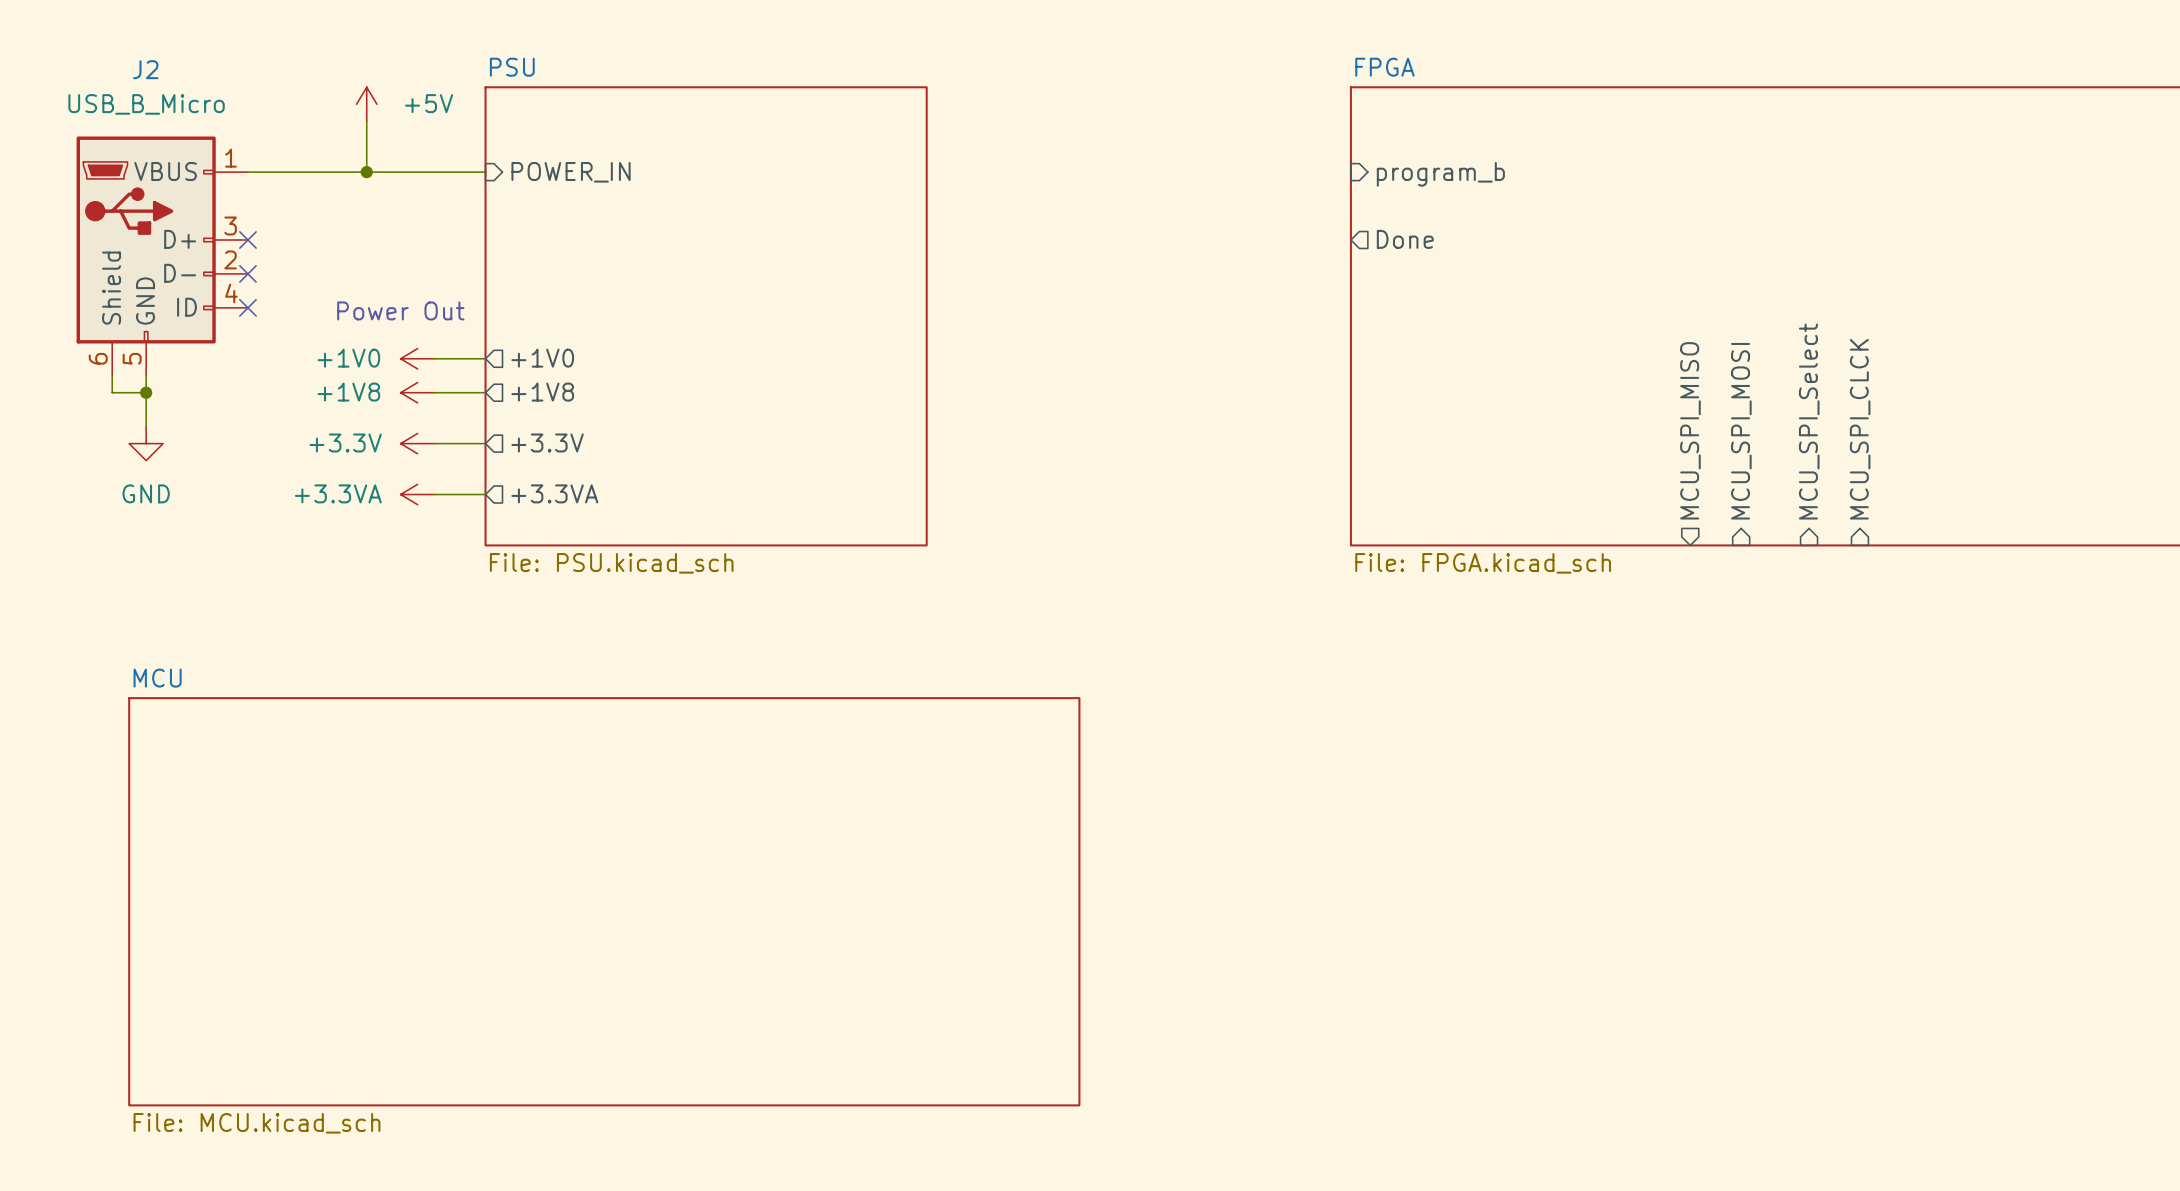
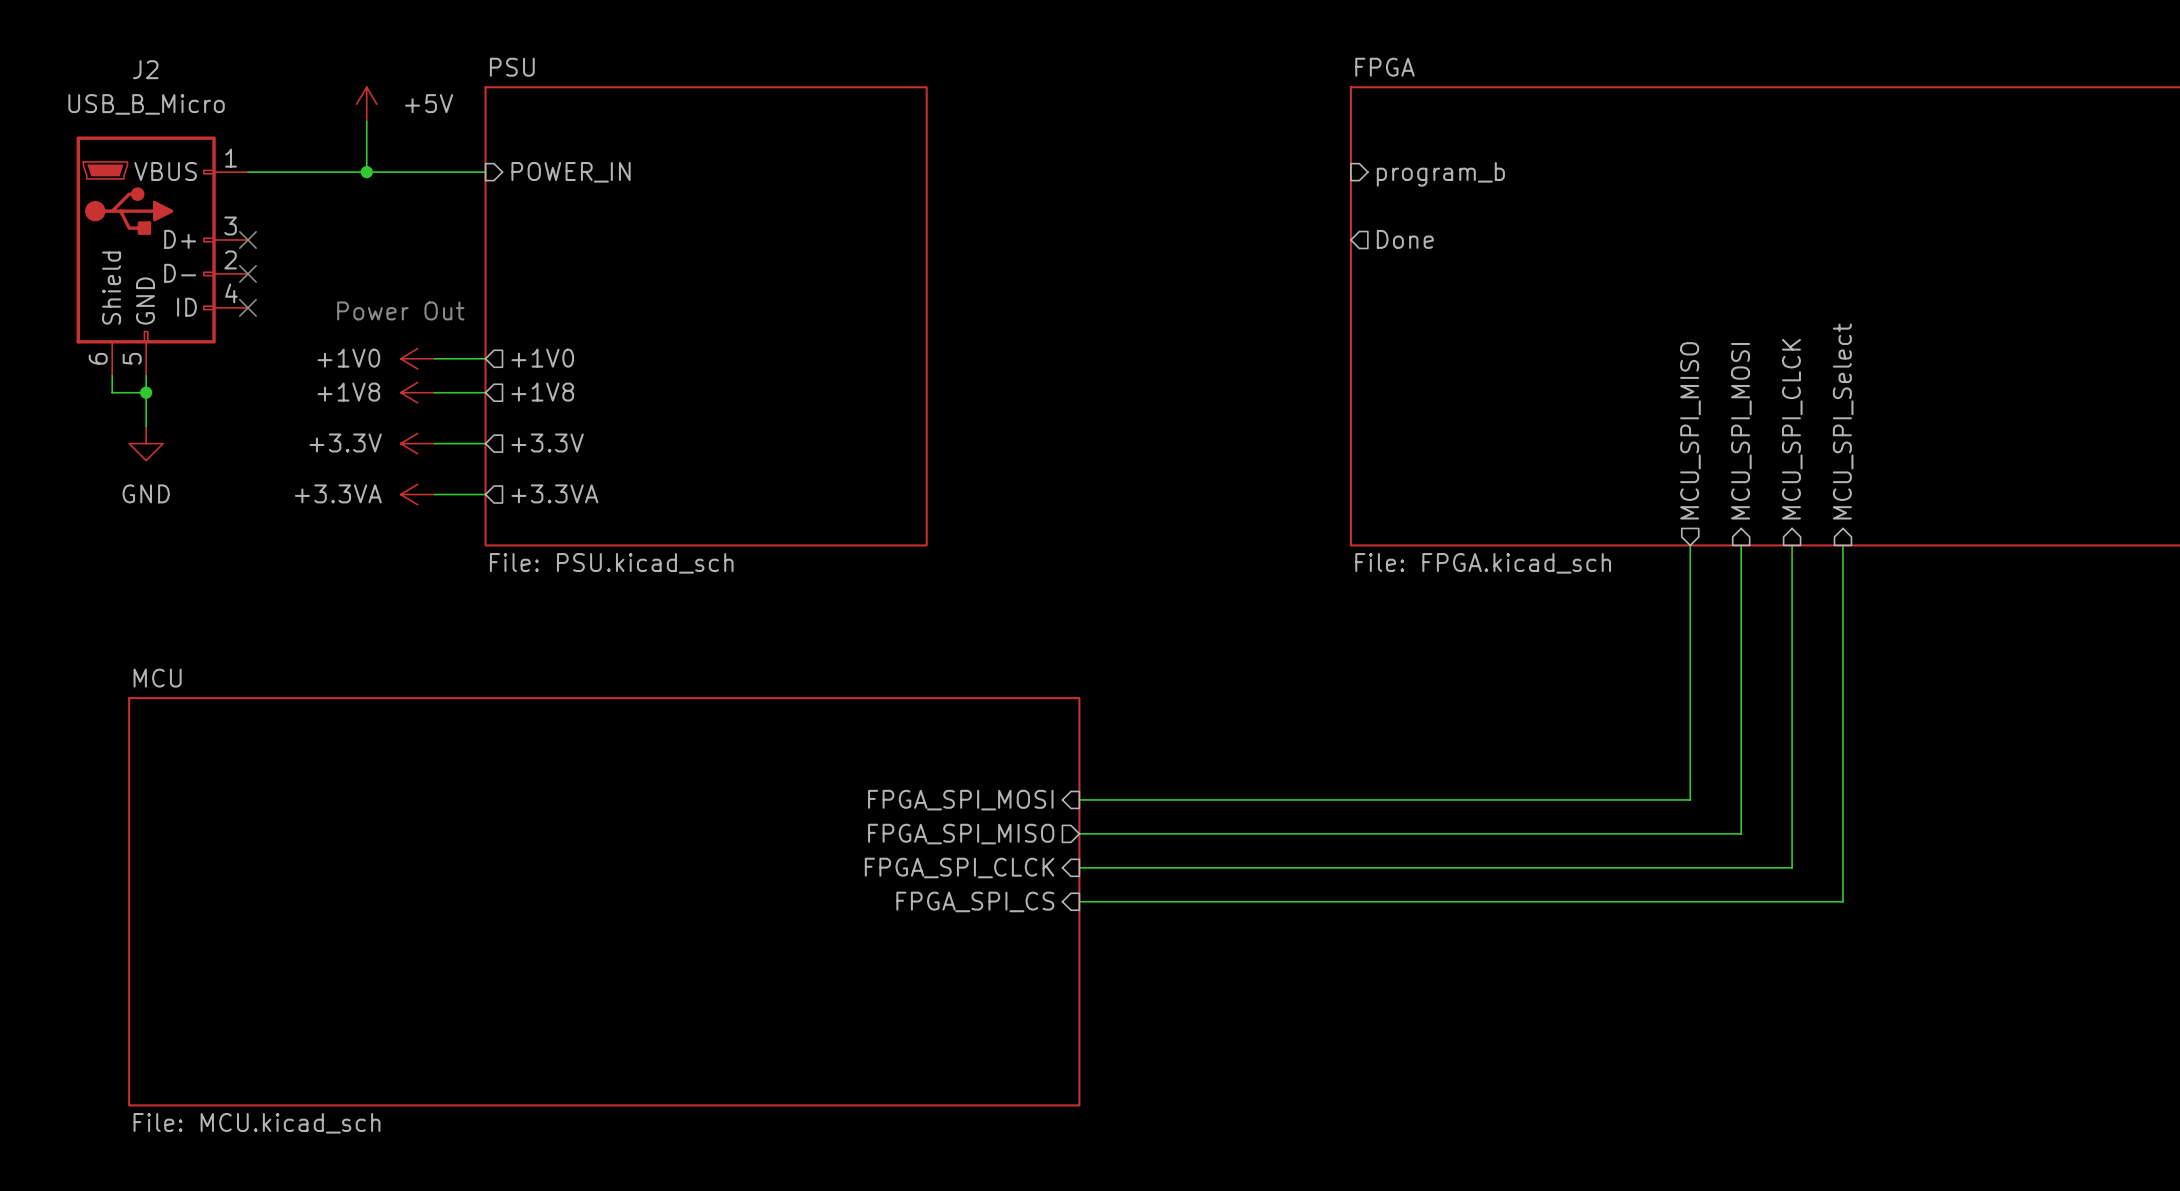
sheet pin position: MCU_SPI_Select (1809, 421) -> MCU_SPI_Select (1843, 421)
sheet pin position: MCU_SPI_CLCK (1860, 429) -> MCU_SPI_CLCK (1792, 429)
wire: none -> (1690, 545) (1690, 799) (1079, 799)
wire: none -> (1741, 545) (1741, 833) (1079, 833)
wire: none -> (1792, 545) (1792, 867) (1079, 867)
wire: none -> (1842, 545) (1842, 901) (1079, 901)
sheet pin: none -> FPGA_SPI_MOSI (960, 800)
sheet pin: none -> FPGA_SPI_MISO (961, 834)
sheet pin: none -> FPGA_SPI_CLCK (959, 868)
sheet pin: none -> FPGA_SPI_CS (975, 901)

